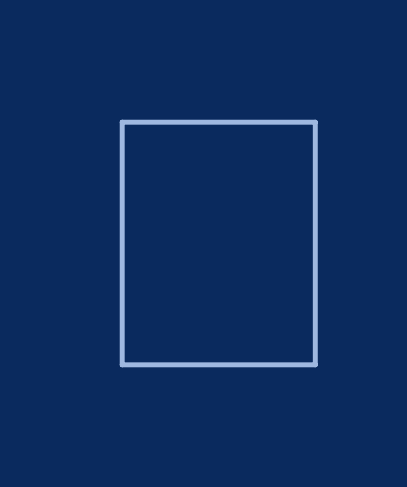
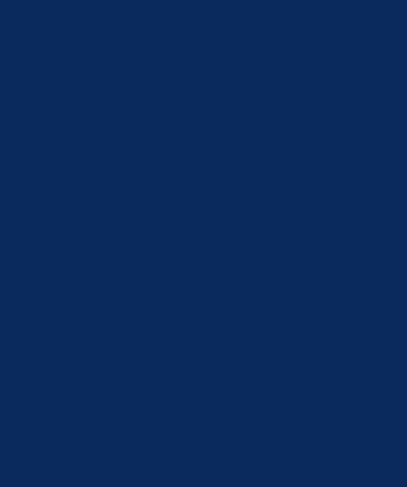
part: (218, 243) -> none

